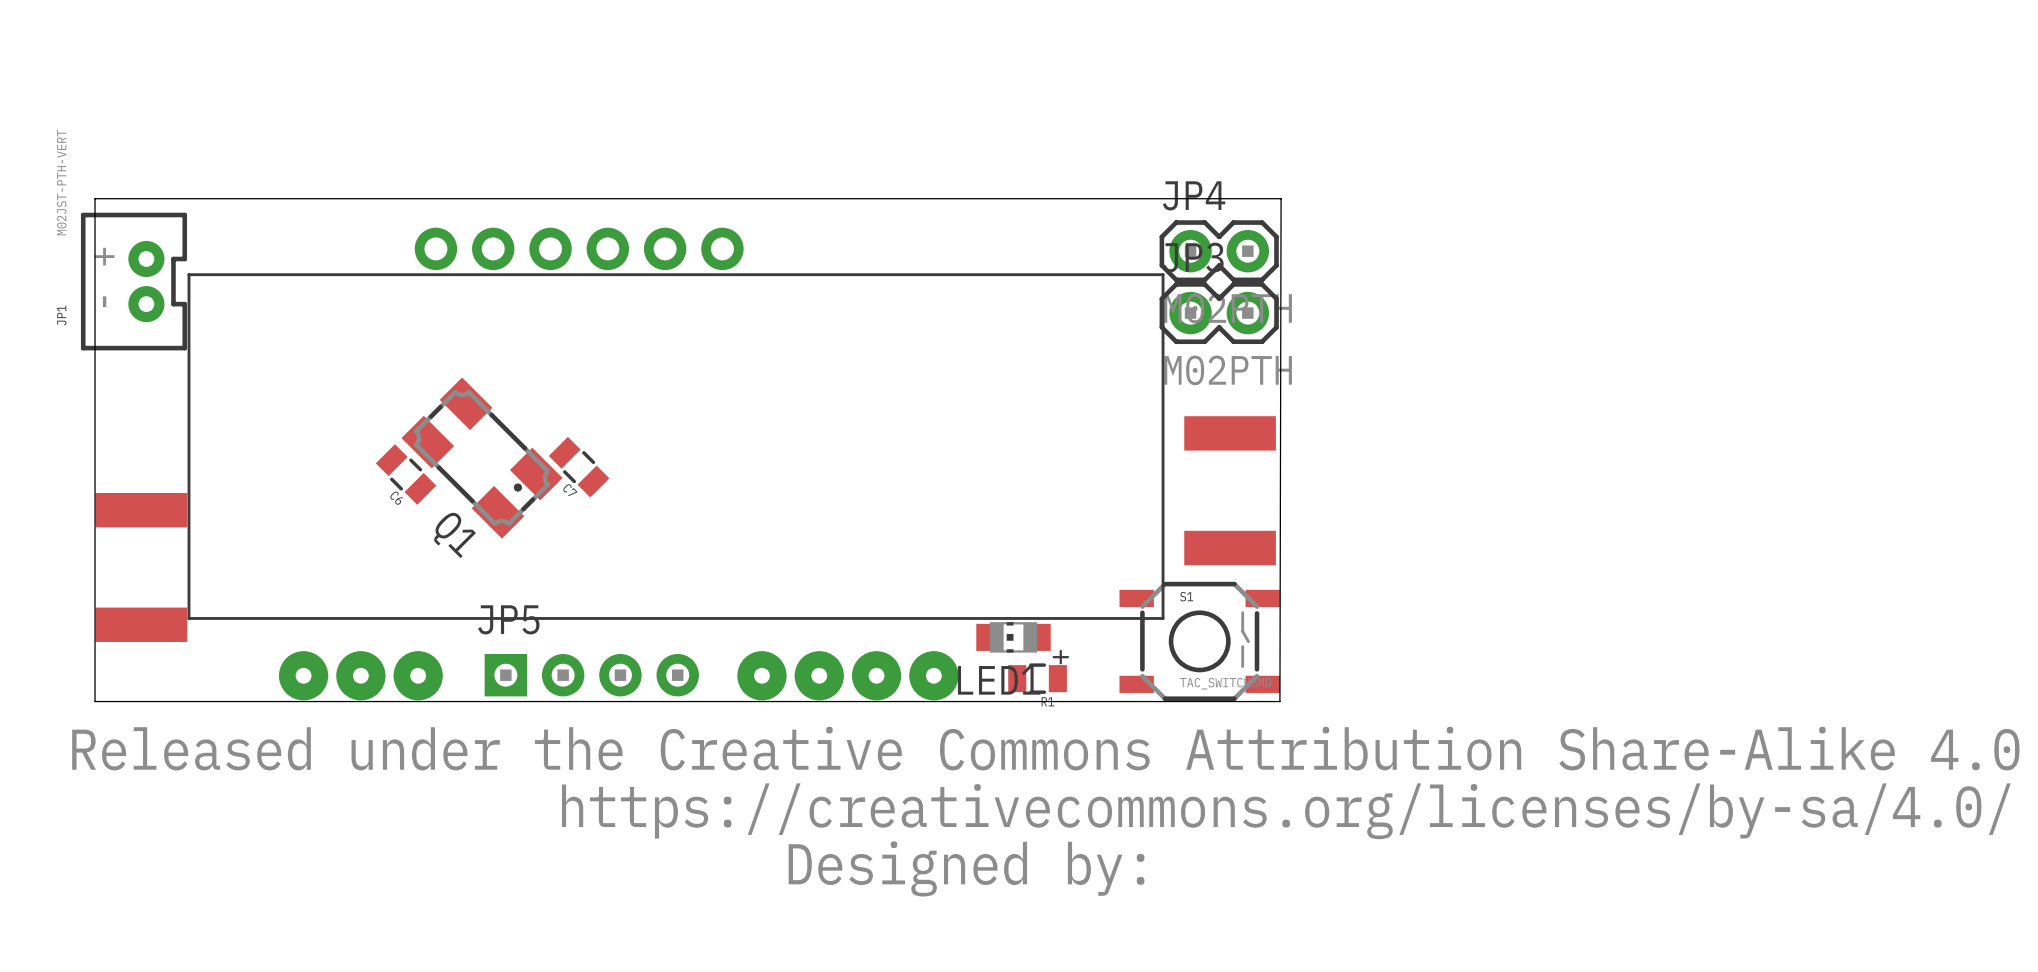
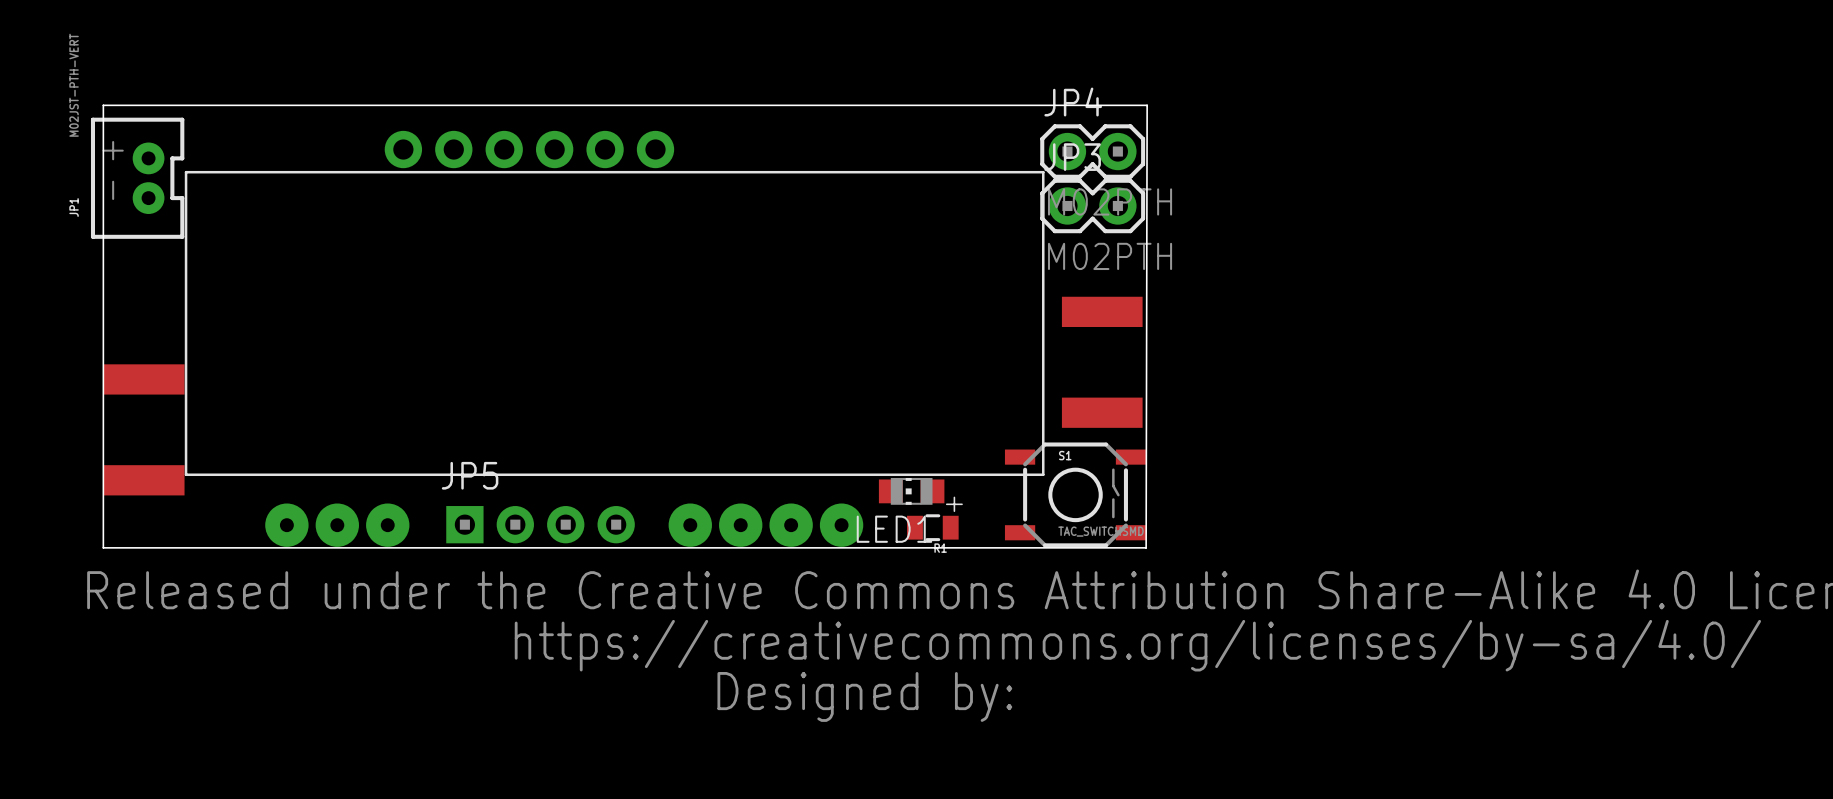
Q1: (482, 458) -> none
C7: (579, 467) -> none
C6: (406, 474) -> none

